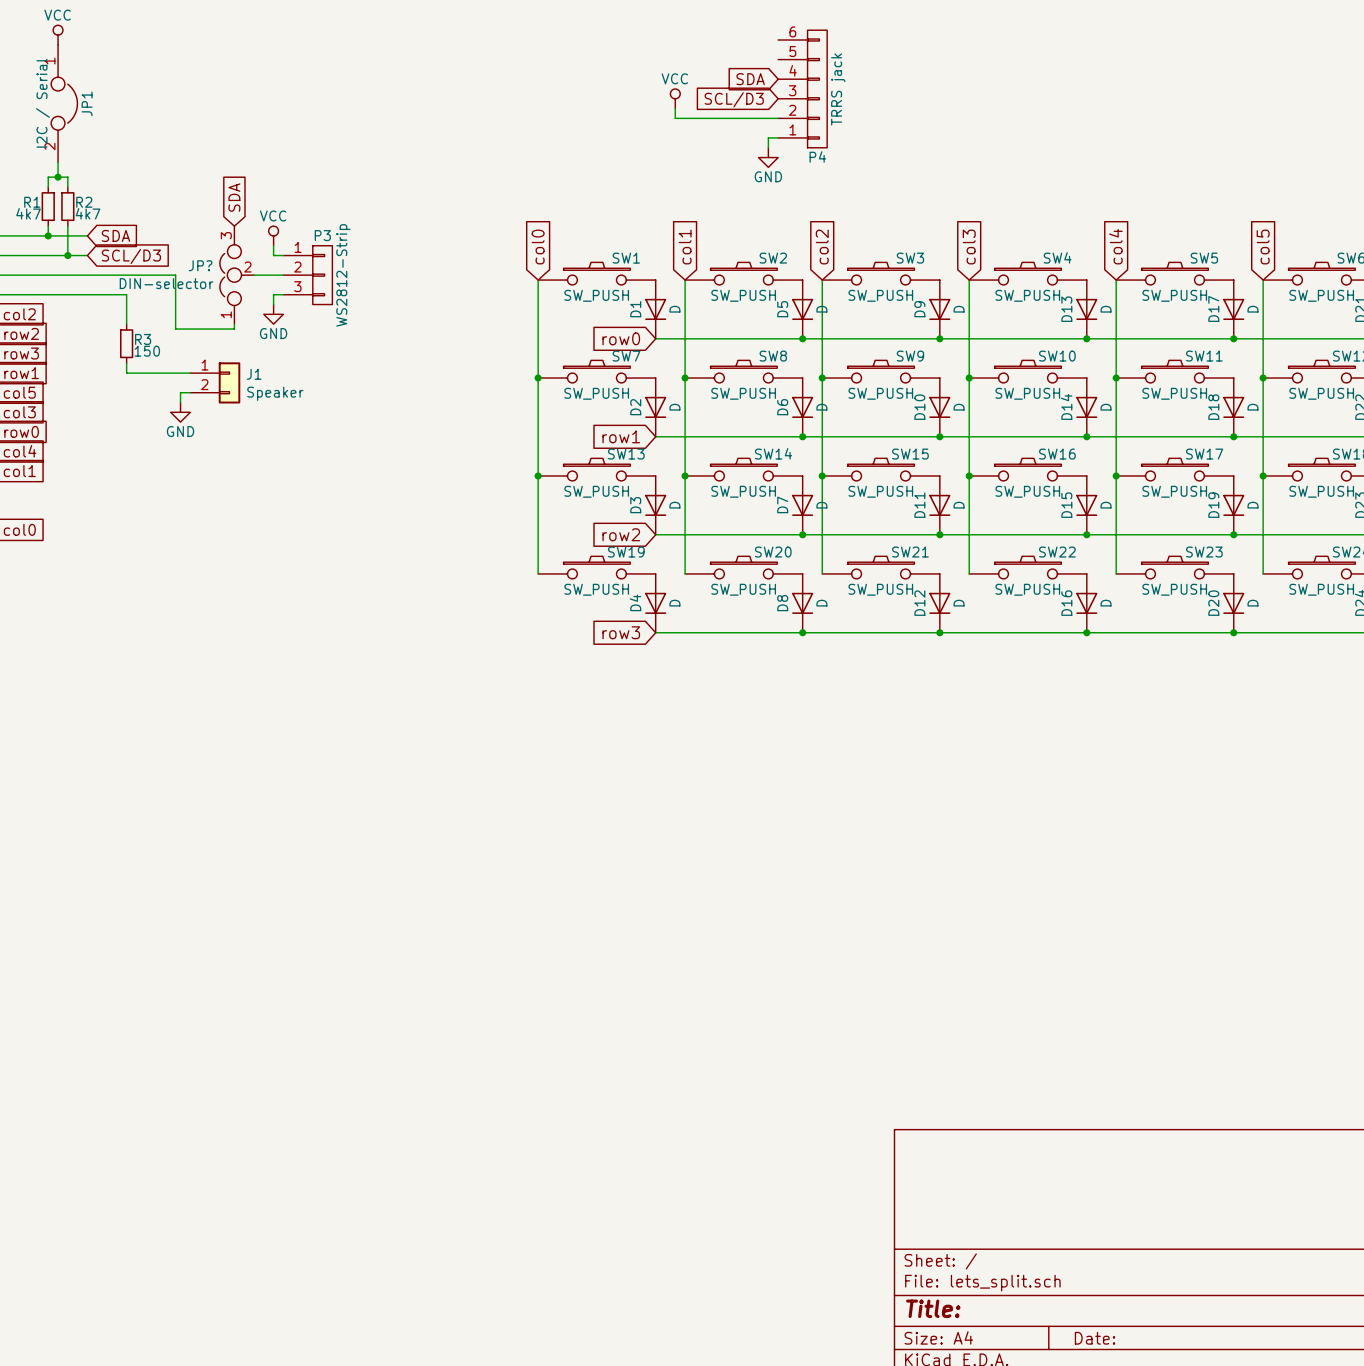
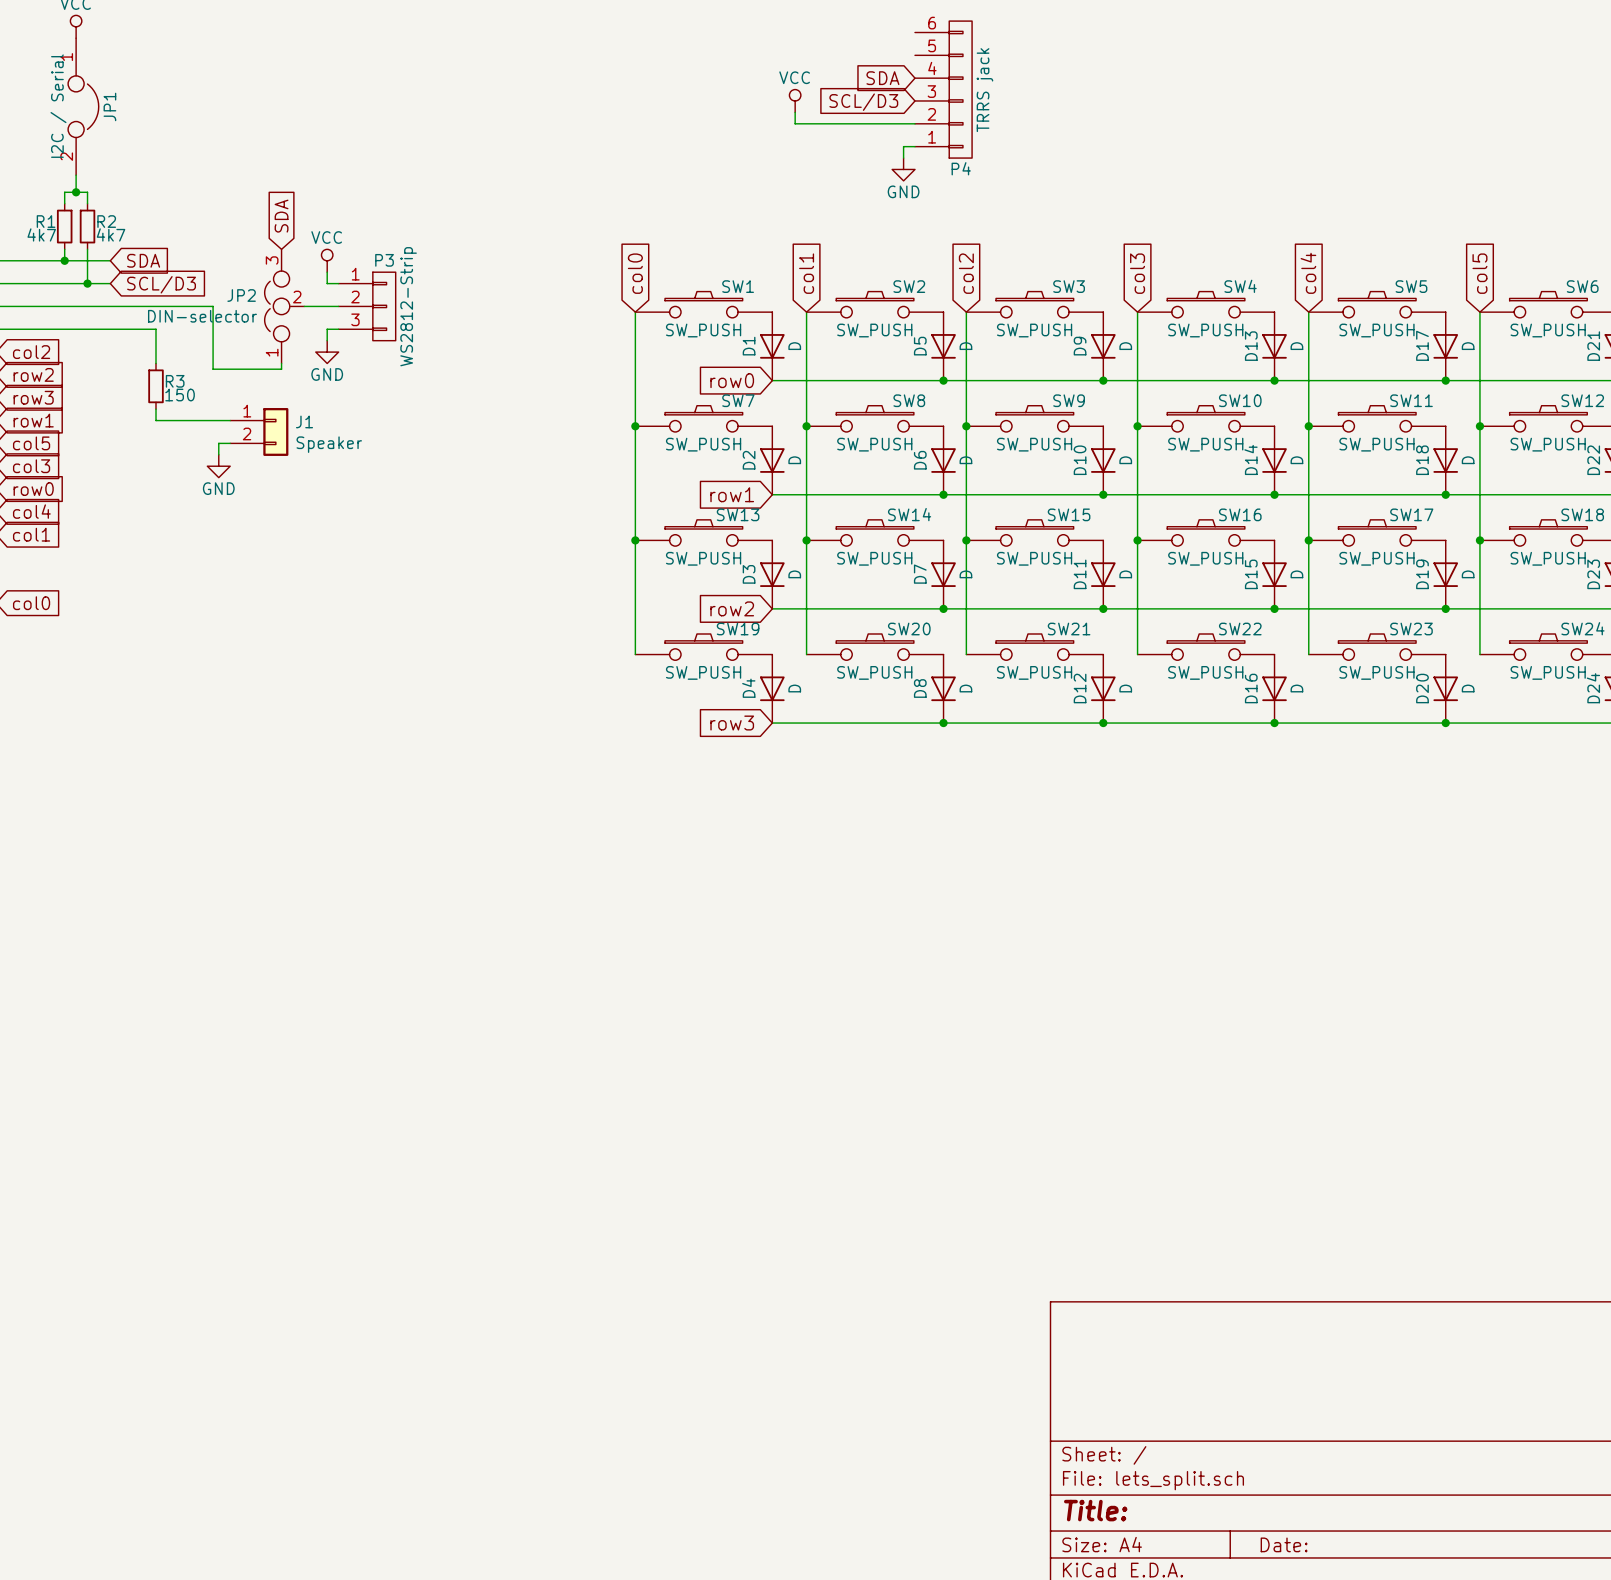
JP? name: JP? (200, 265) -> JP2 (241, 295)

